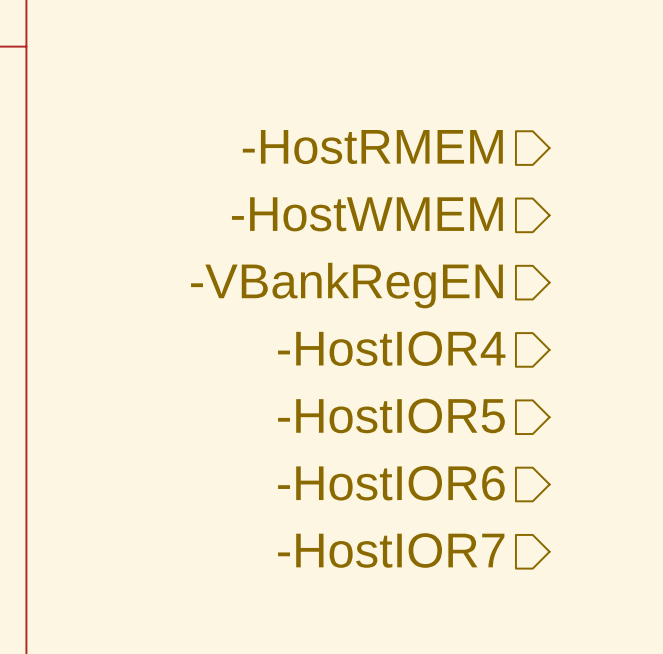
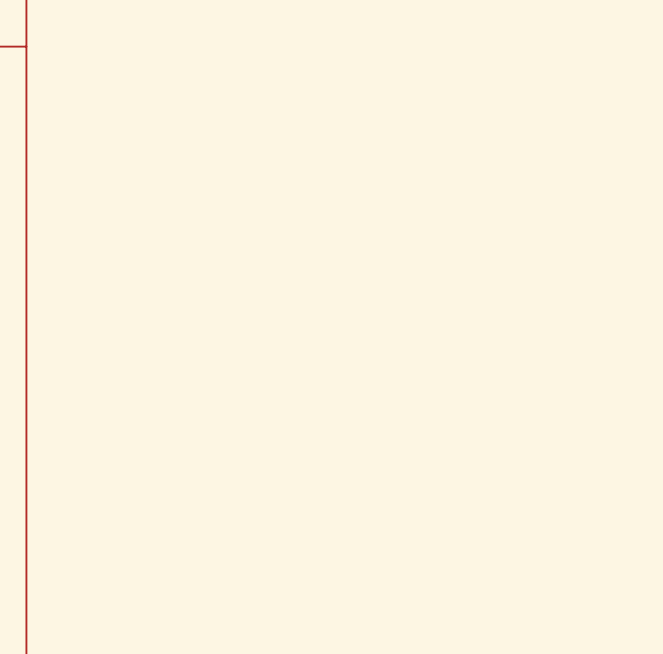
hierarchical label: -HostRMEM (372, 147) -> none
hierarchical label: -HostWMEM (367, 214) -> none
hierarchical label: -VBankRegEN (346, 285) -> none
hierarchical label: -HostIOR4 (391, 348) -> none
hierarchical label: -HostIOR5 (391, 415) -> none
hierarchical label: -HostIOR6 (391, 483) -> none
hierarchical label: -HostIOR7 (391, 550) -> none

